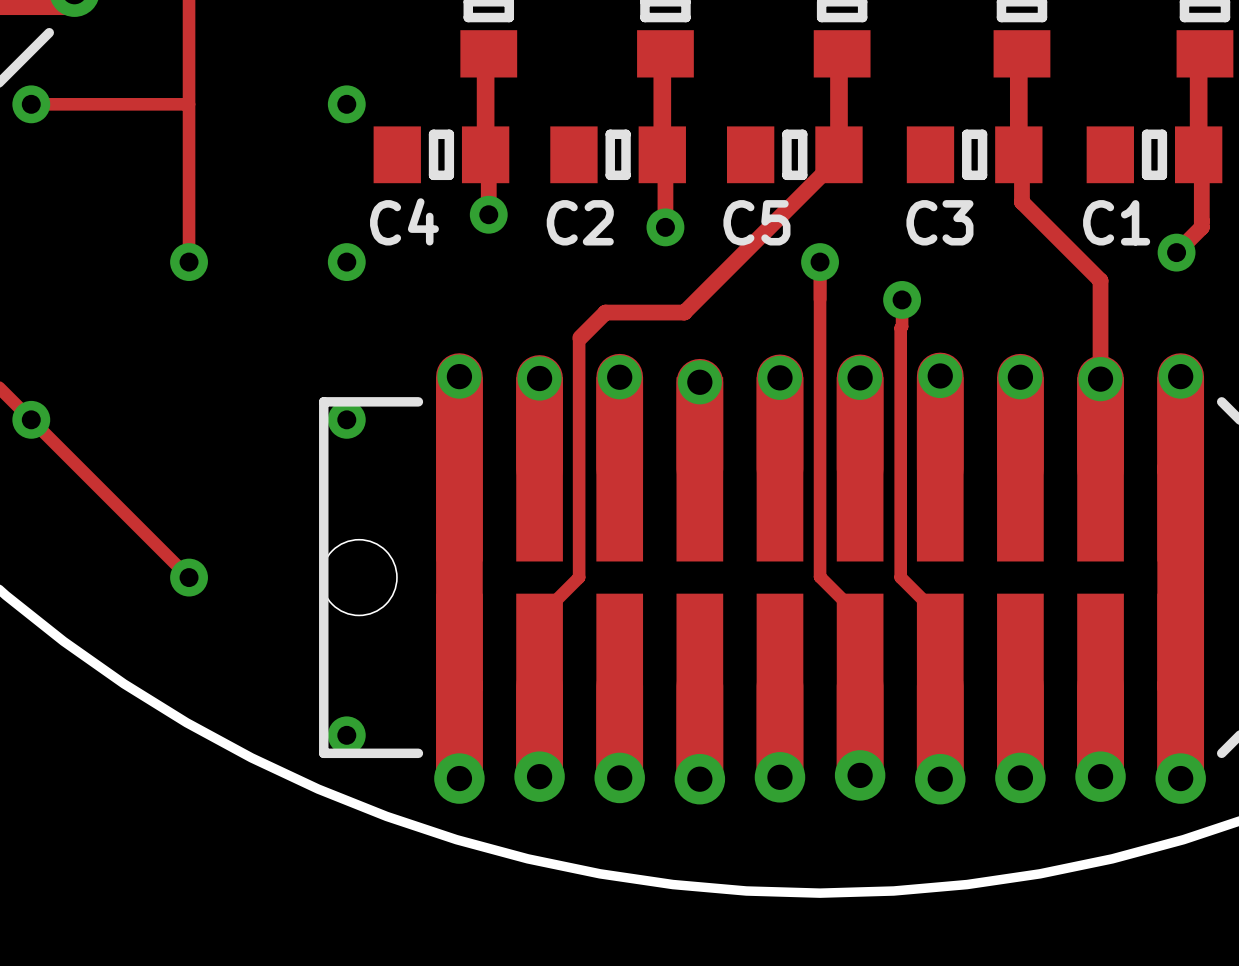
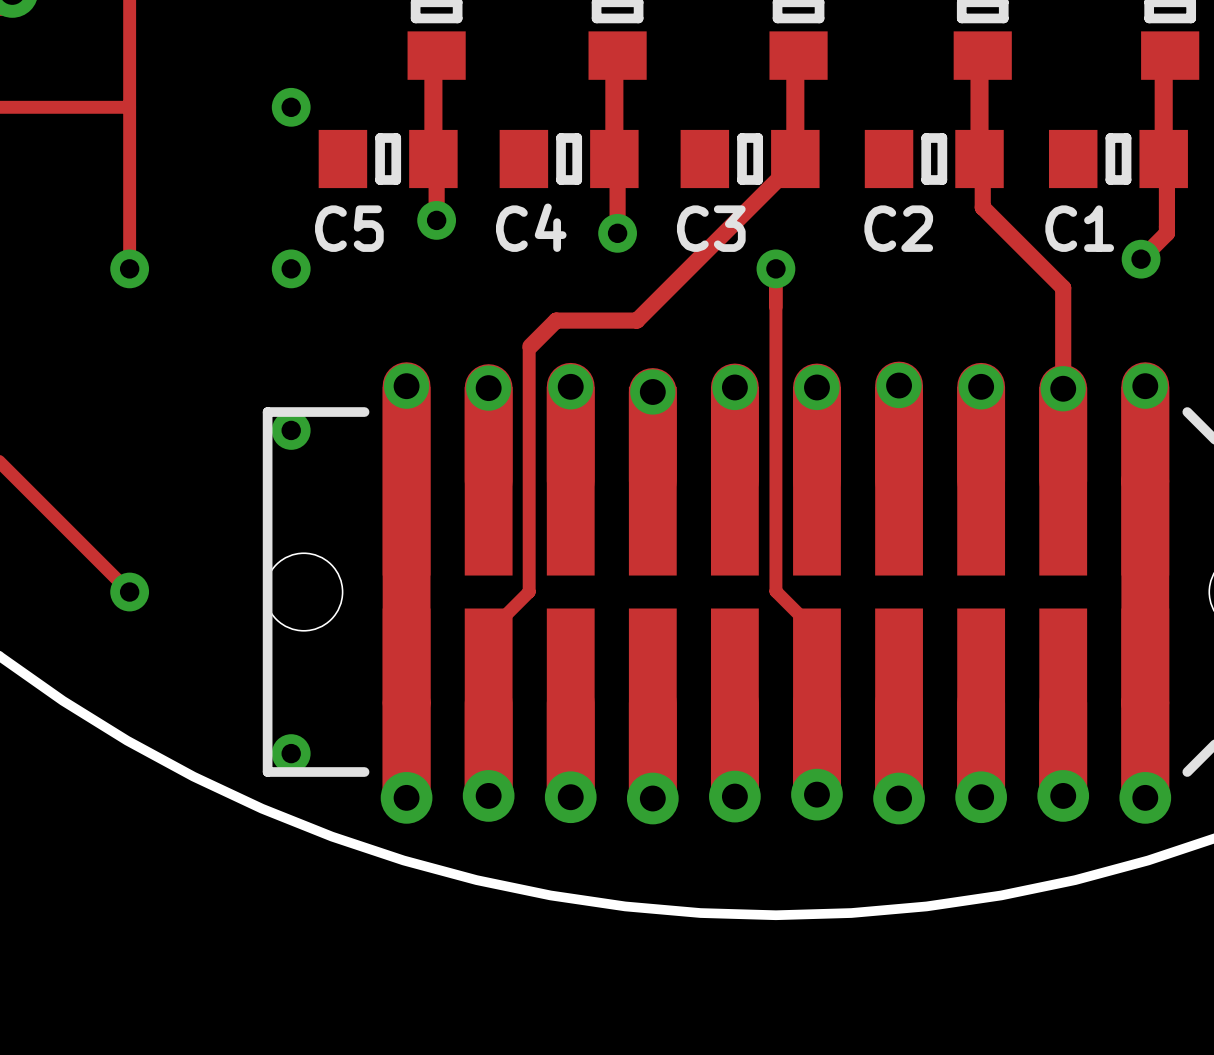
text: C4 (404, 221) -> C5 (349, 228)
text: C2 (580, 222) -> C4 (531, 227)
text: C5 (756, 222) -> C3 (711, 228)
text: C3 (939, 222) -> C2 (898, 228)
track: (902, 299) (900, 577) (940, 617) -> none
via: (902, 299) -> none

